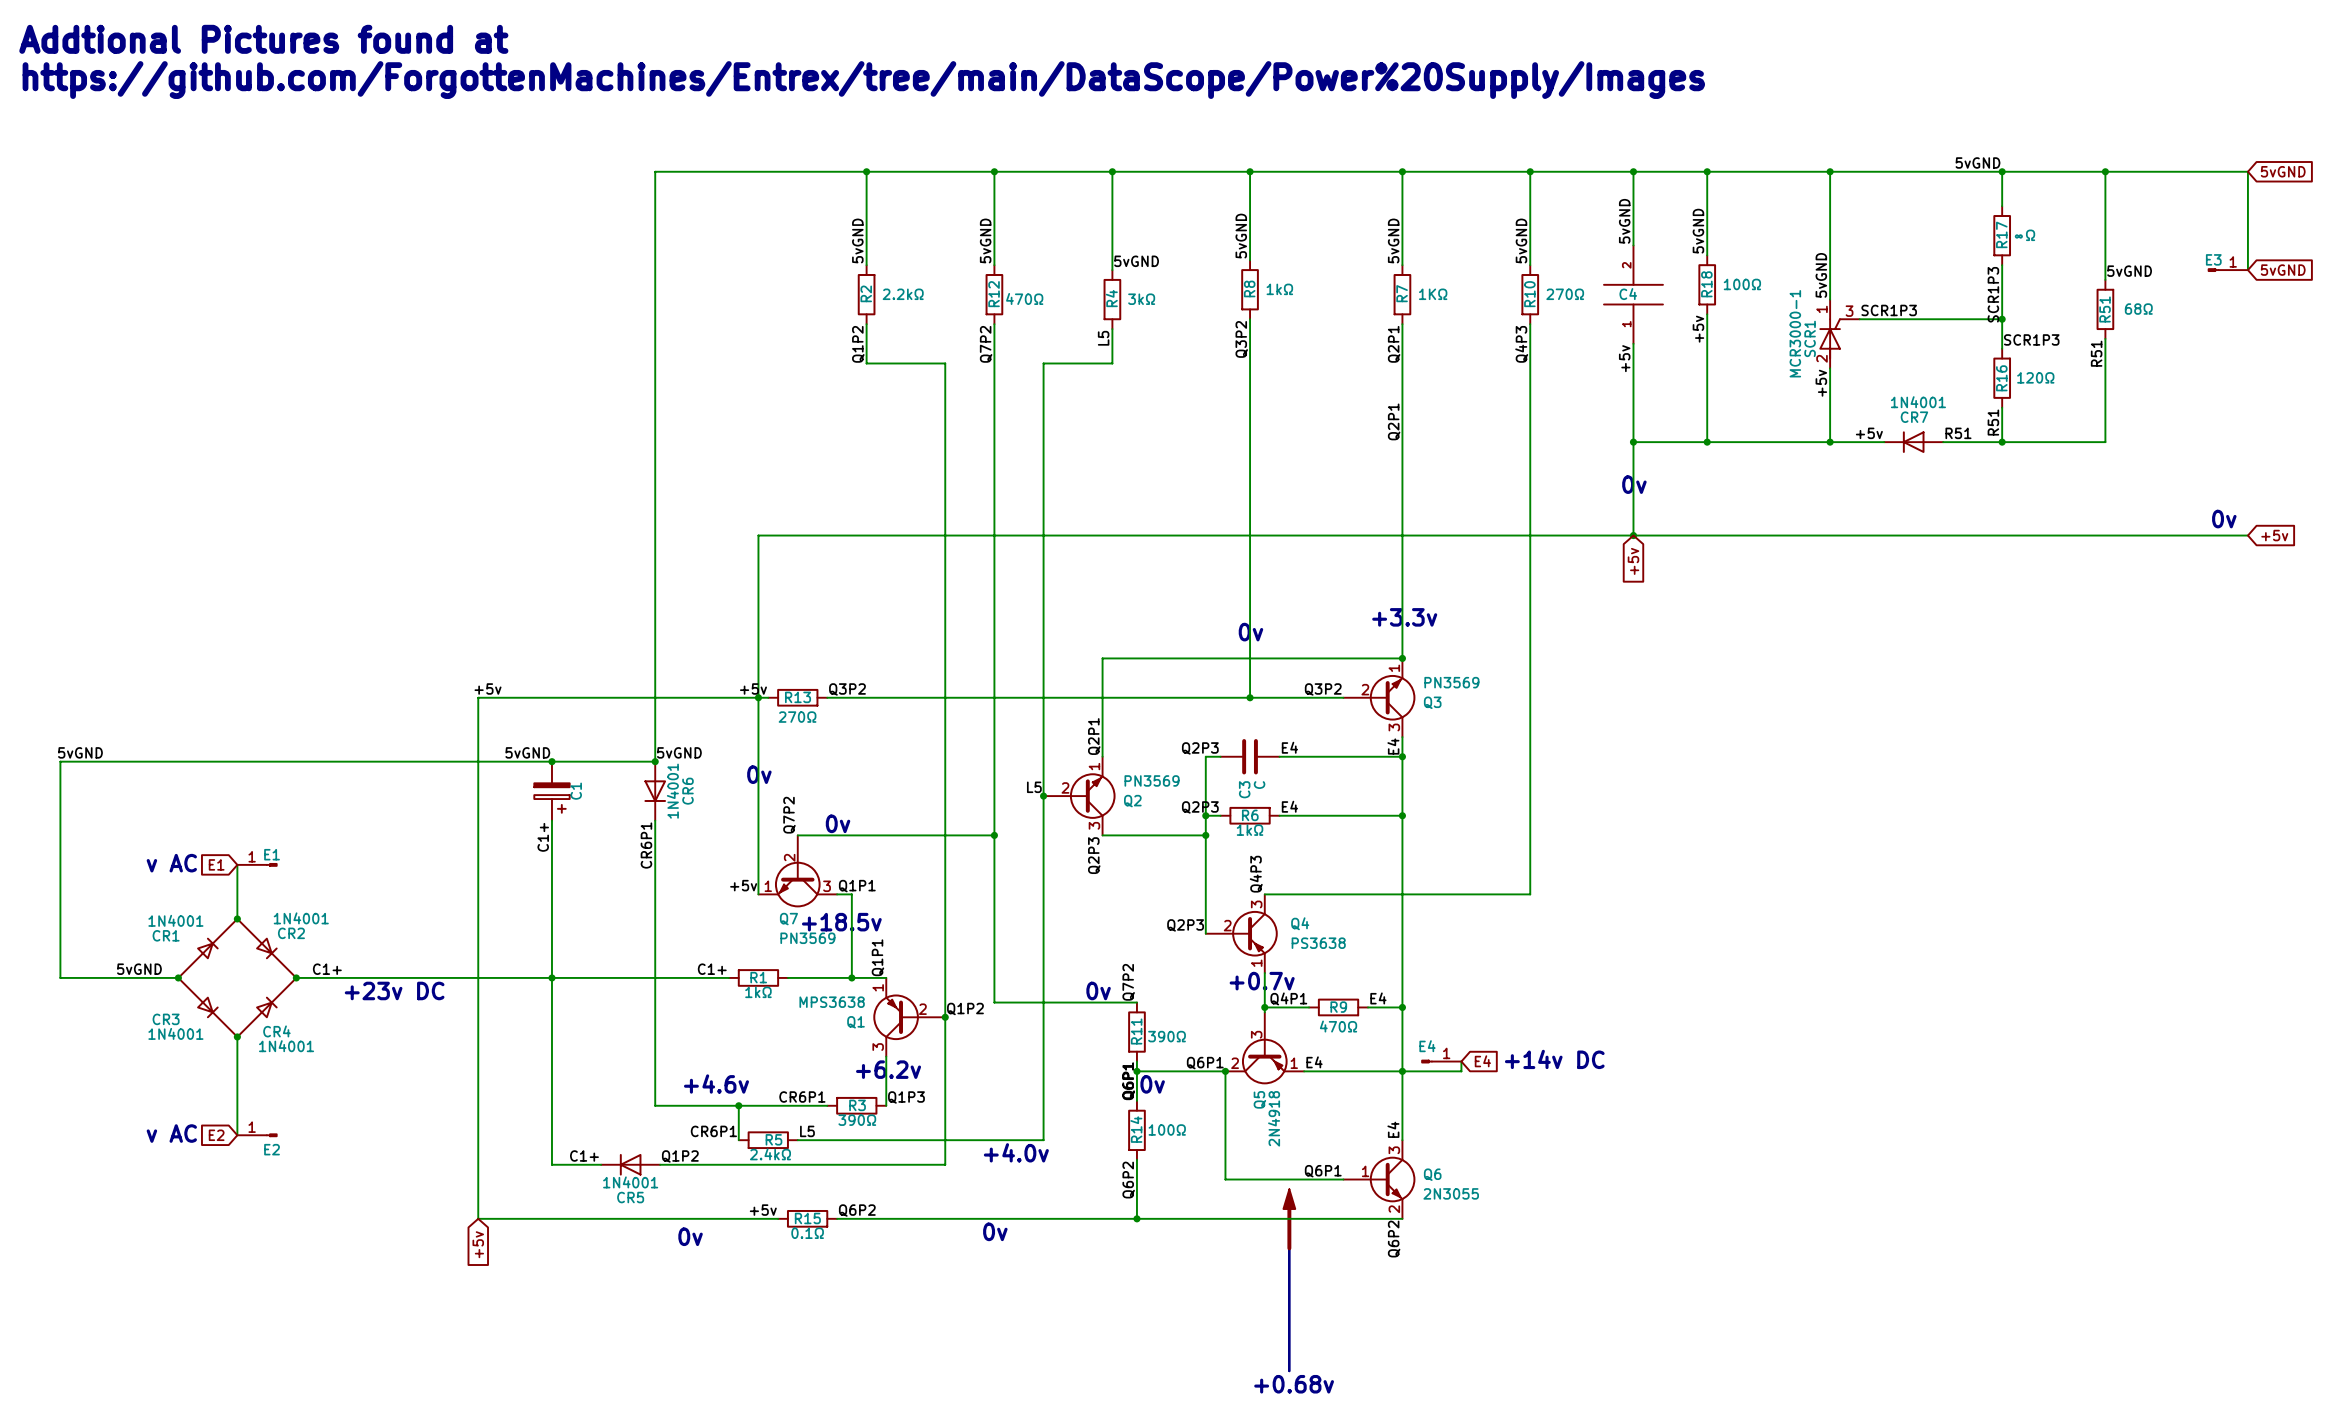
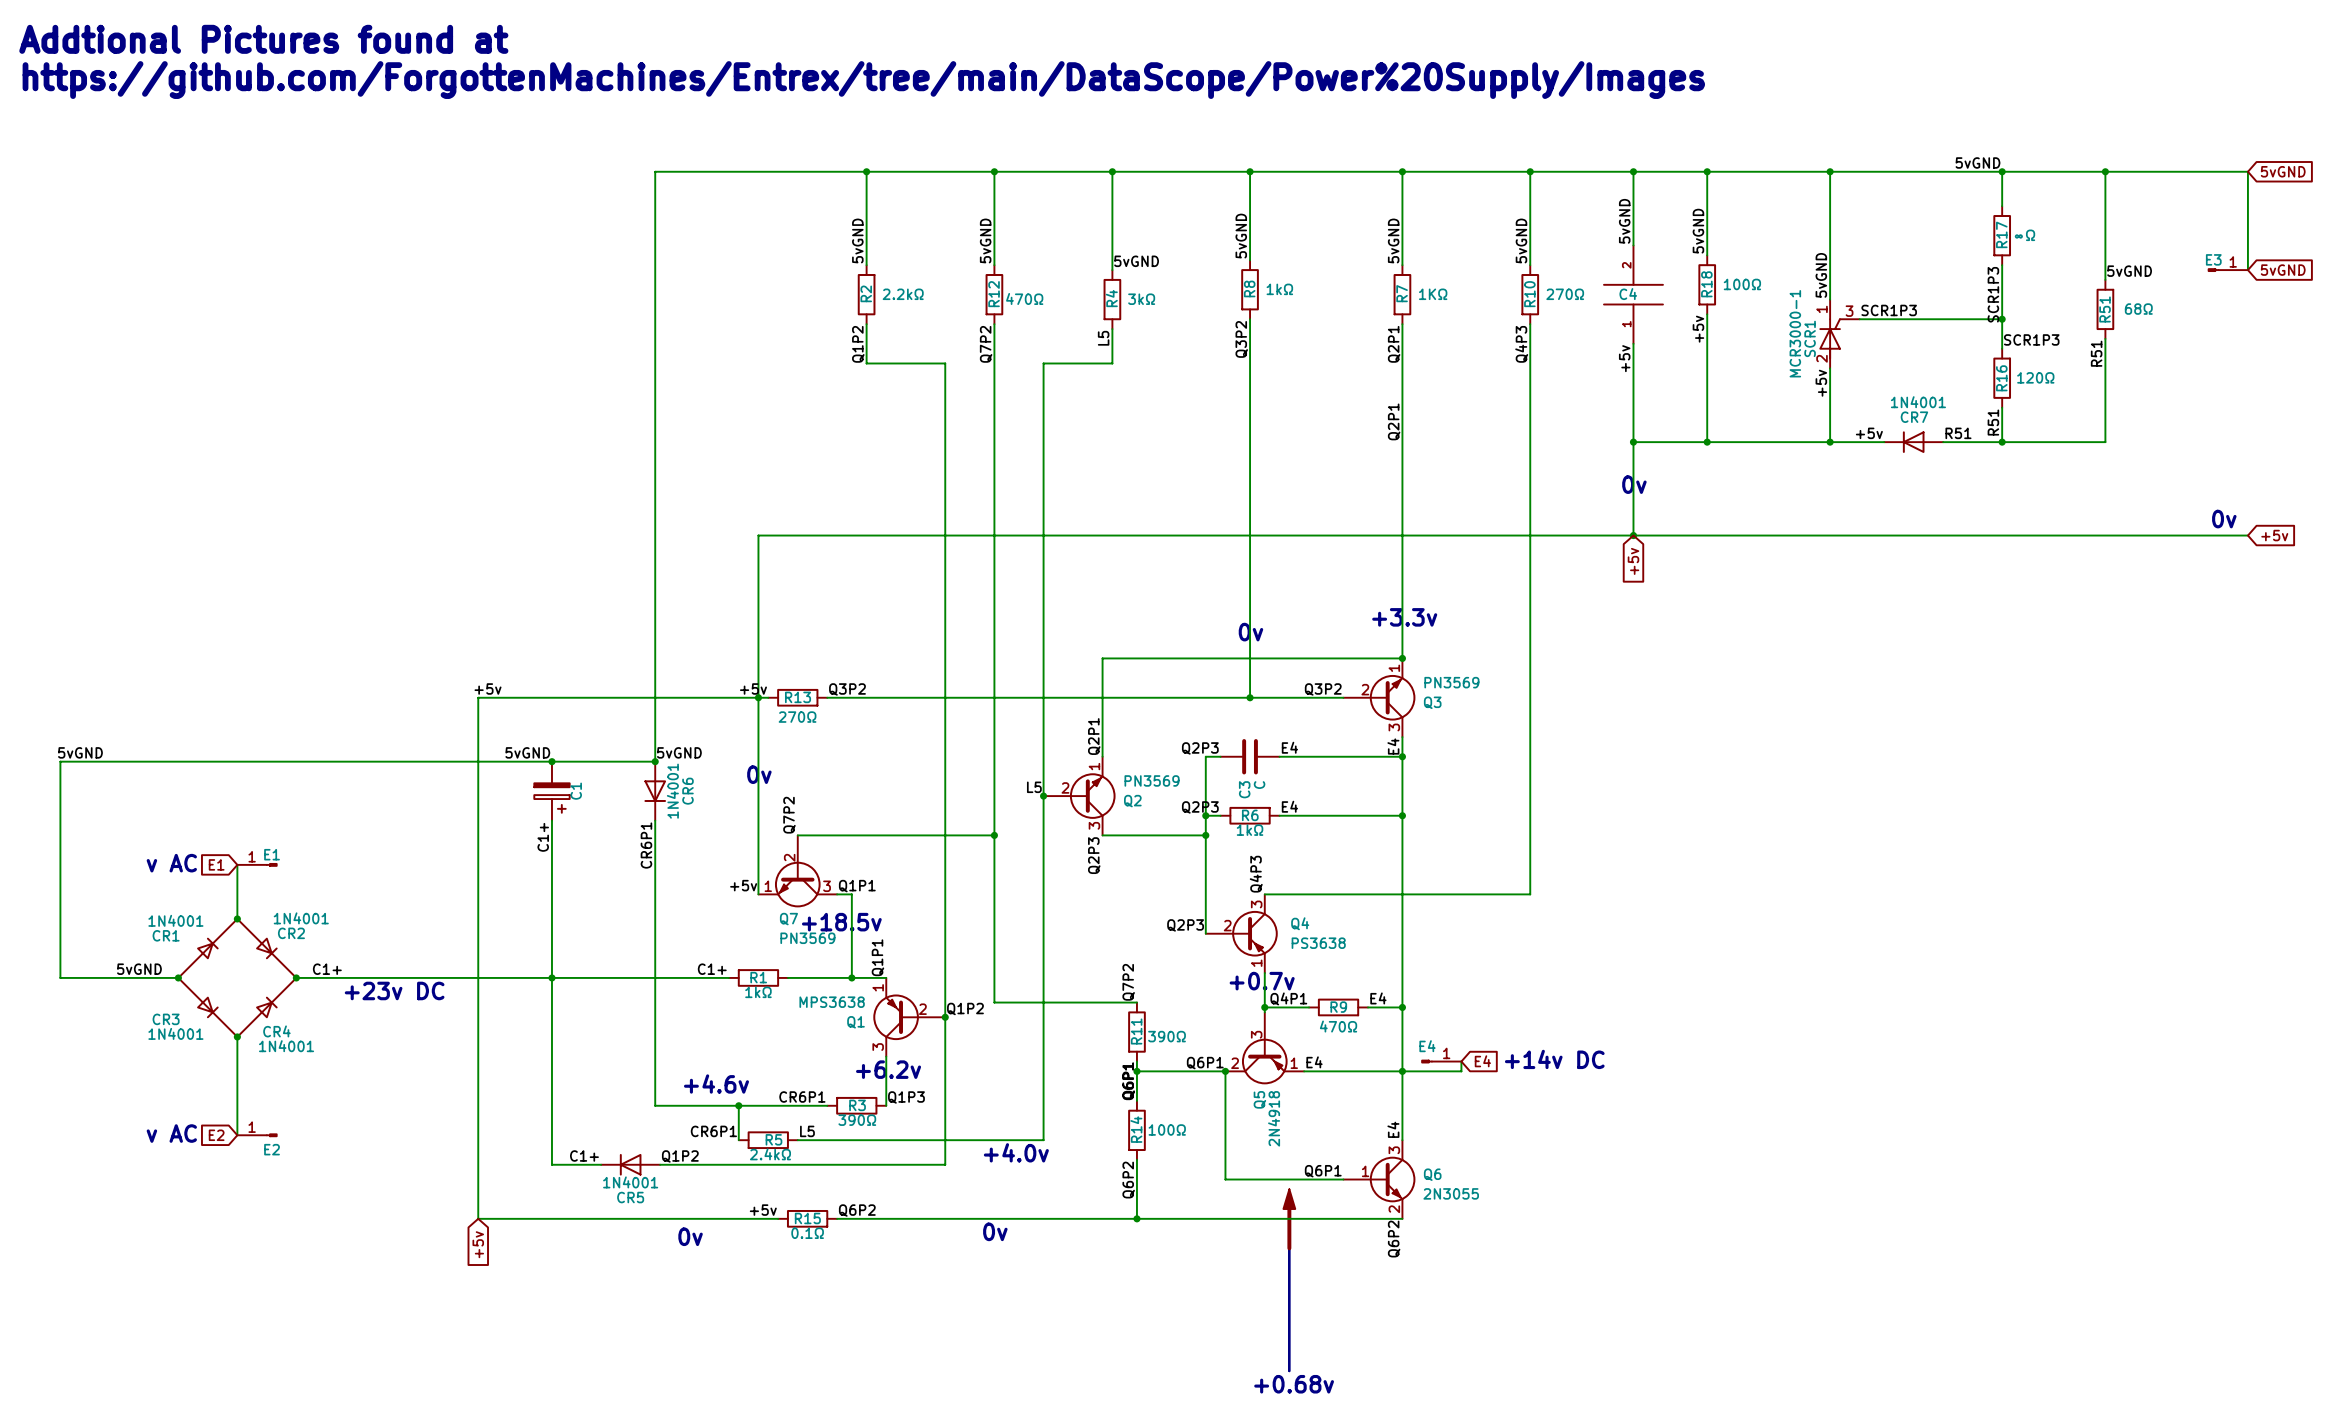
text: 0v (838, 823) -> none
text: 0v (1098, 990) -> none
text: 0v (1152, 1084) -> none

